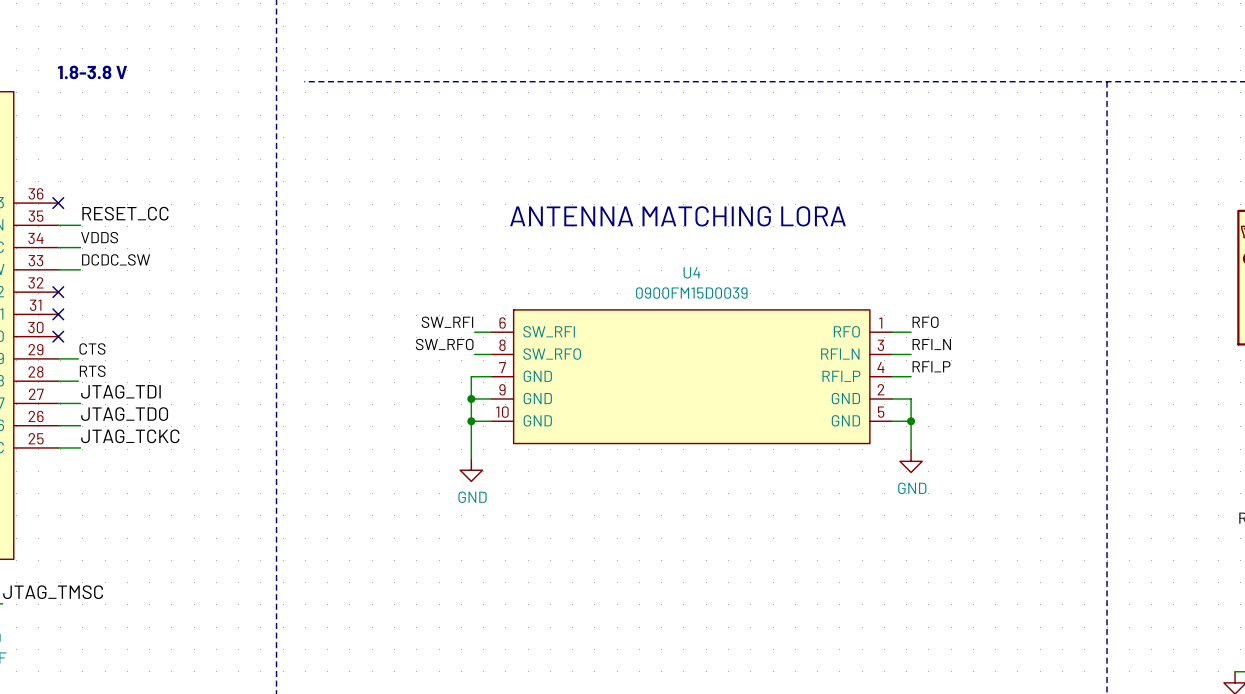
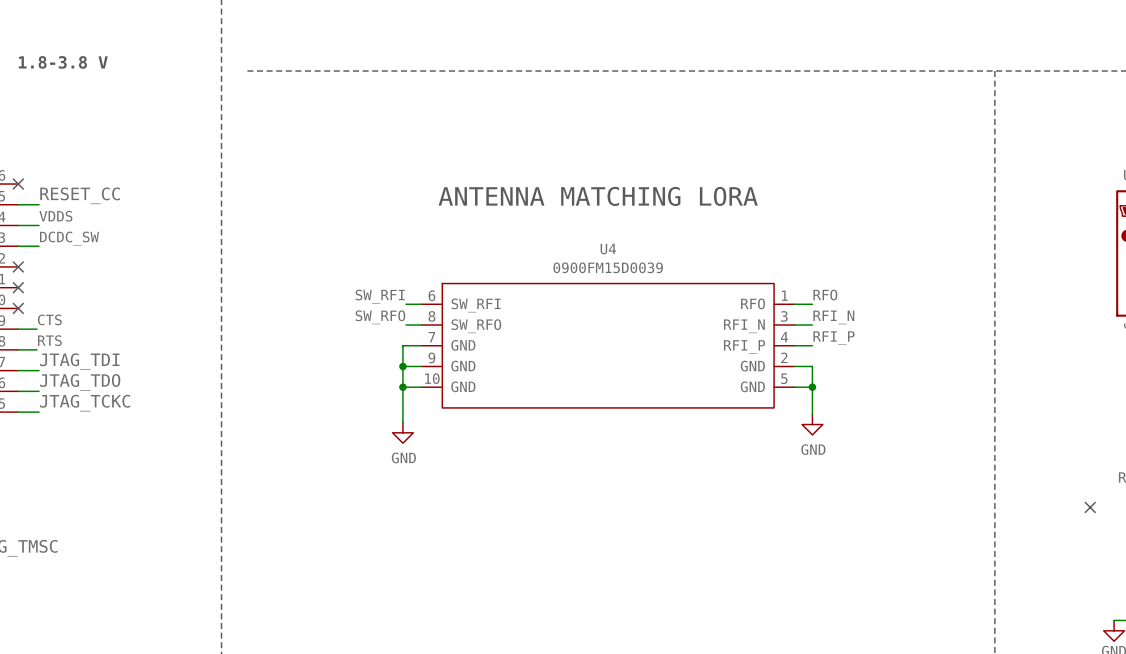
no-connect mark: none -> (1090, 507)

